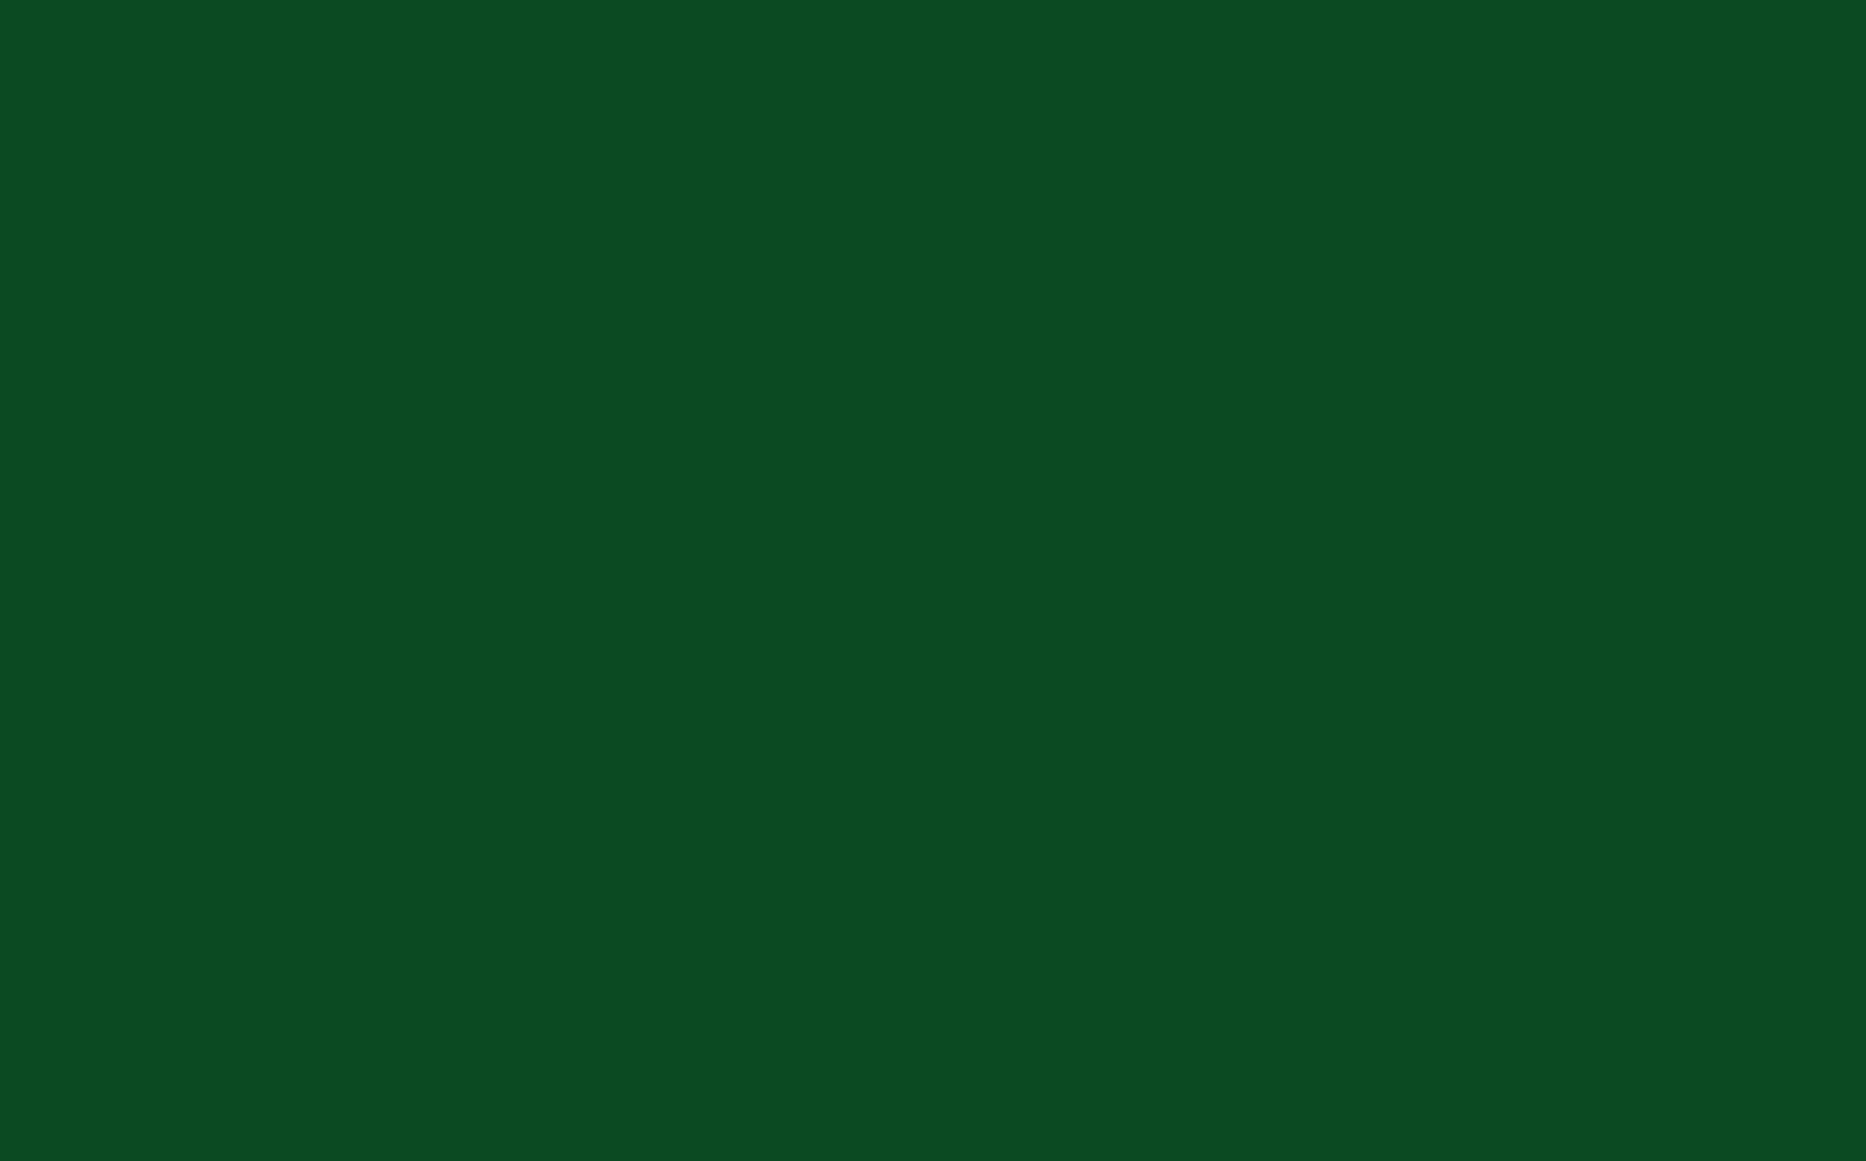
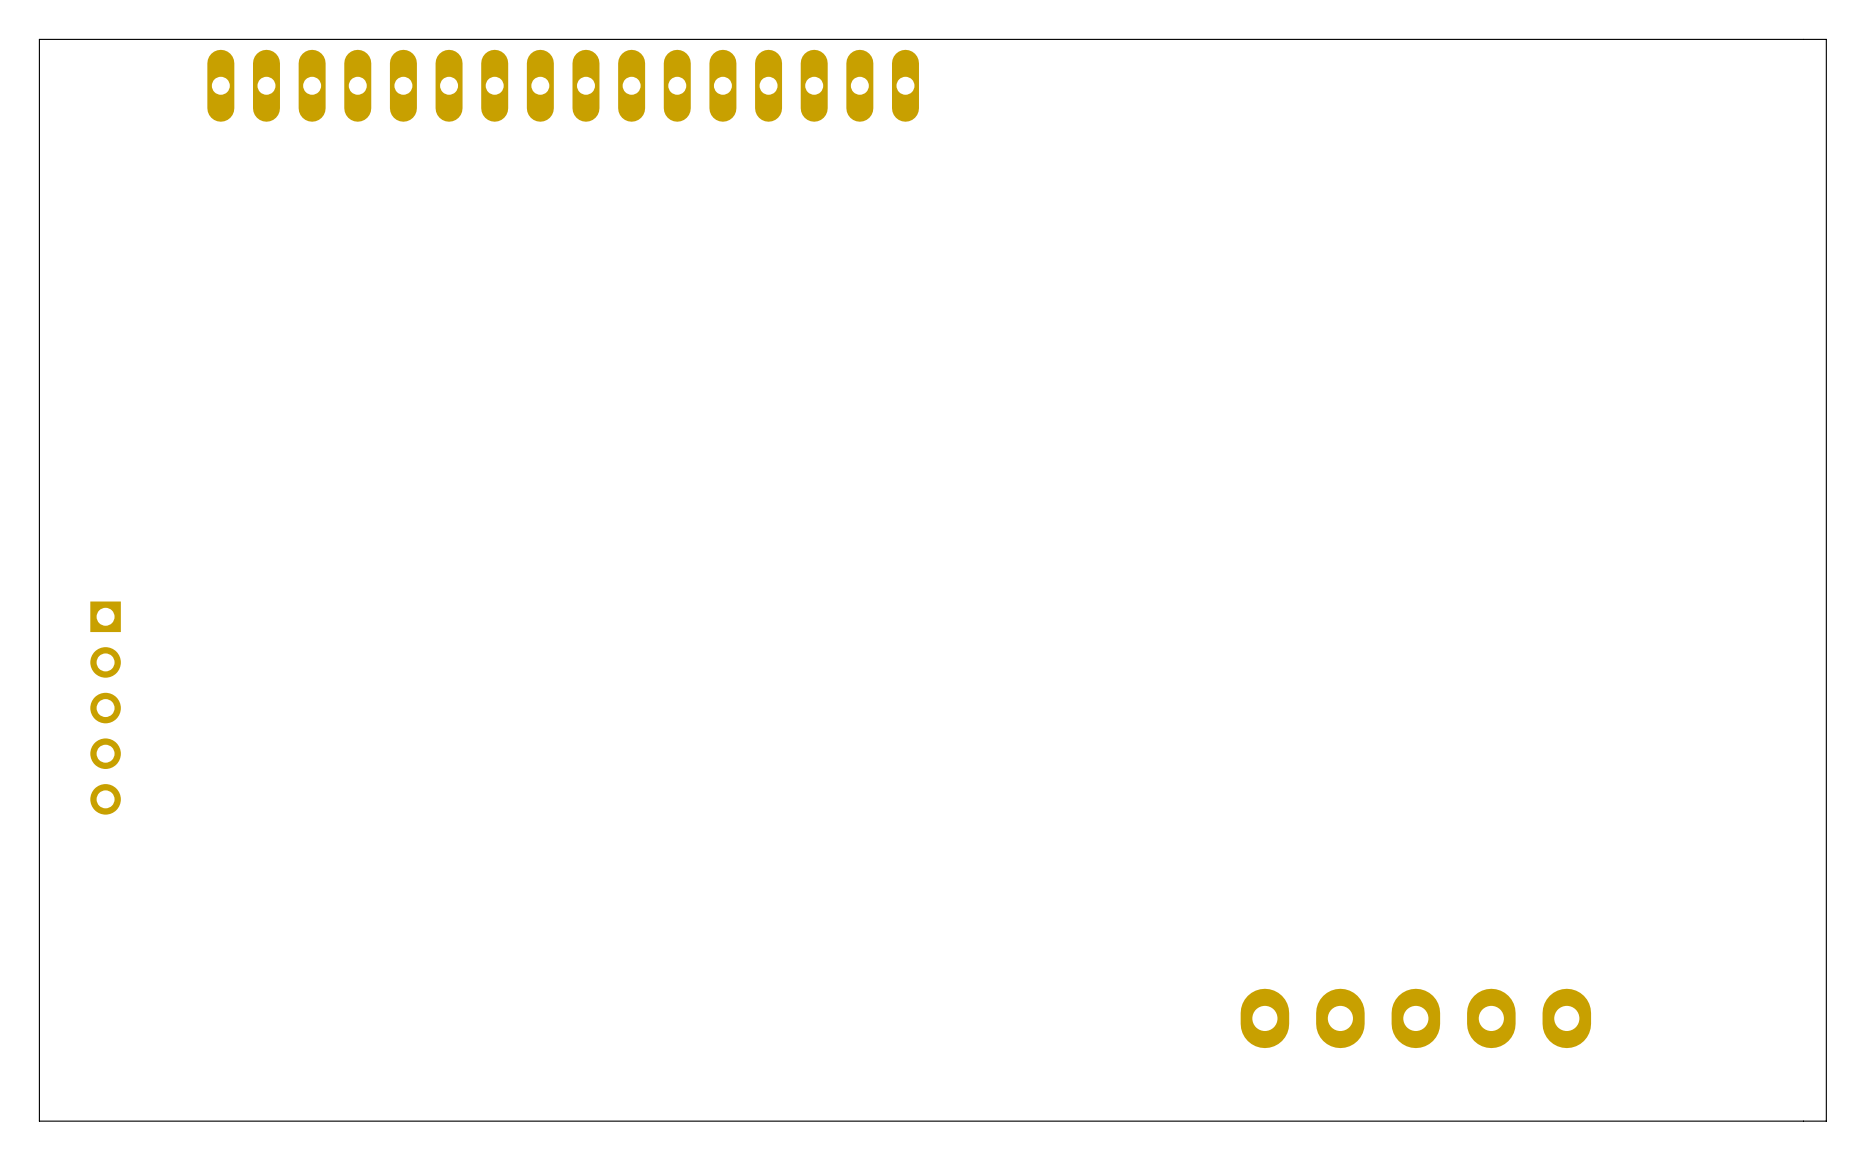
board edge: none -> (1826, 39) (1826, 1121) (39, 1121) (39, 39) (1826, 39)
part: none -> (563, 85)
part: none -> (105, 708)
part: none -> (1415, 1018)

